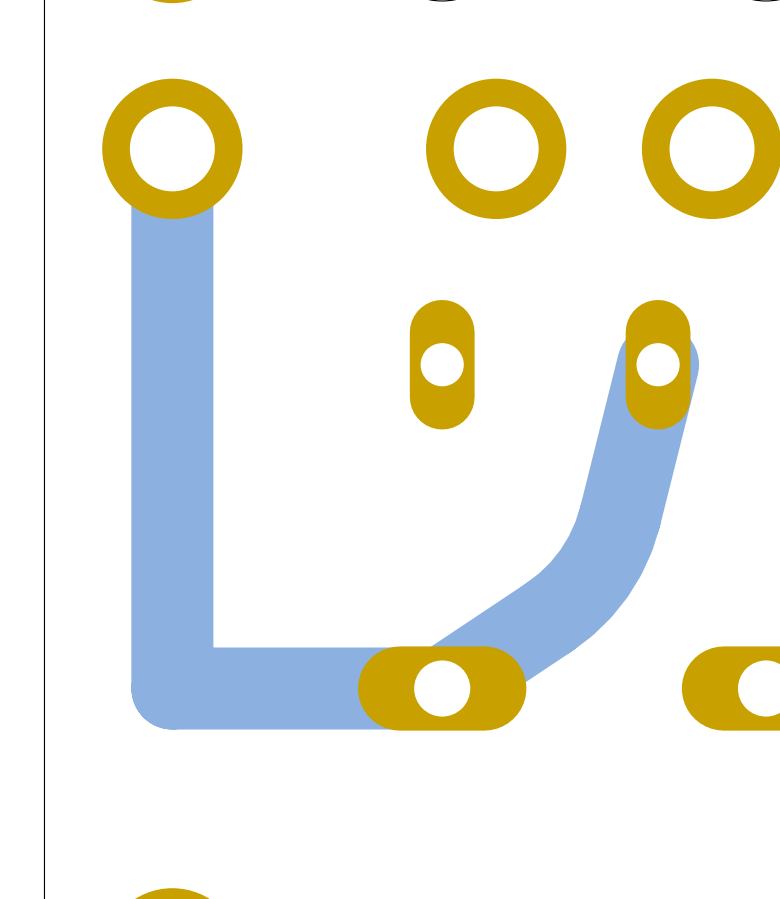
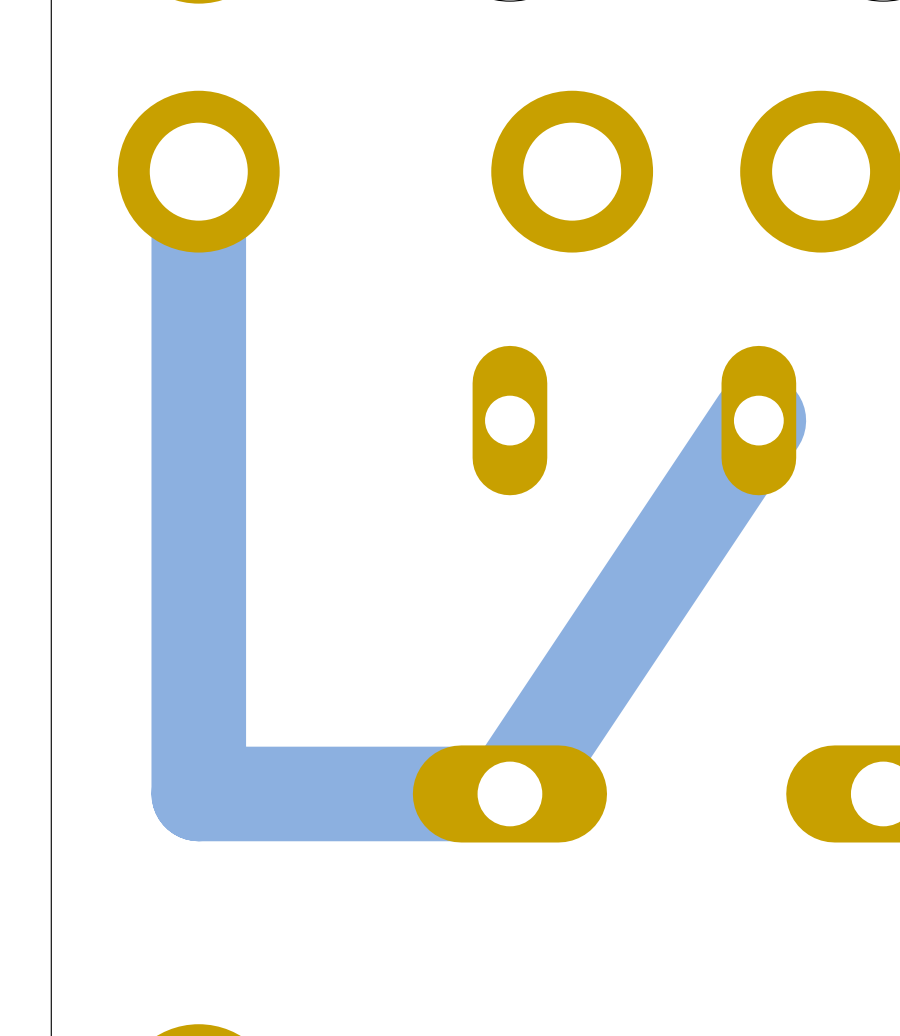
track: (658, 364) (620, 516) (613, 536) (594, 573) (580, 589) (549, 617) (442, 688) -> (758, 420) (509, 793)

